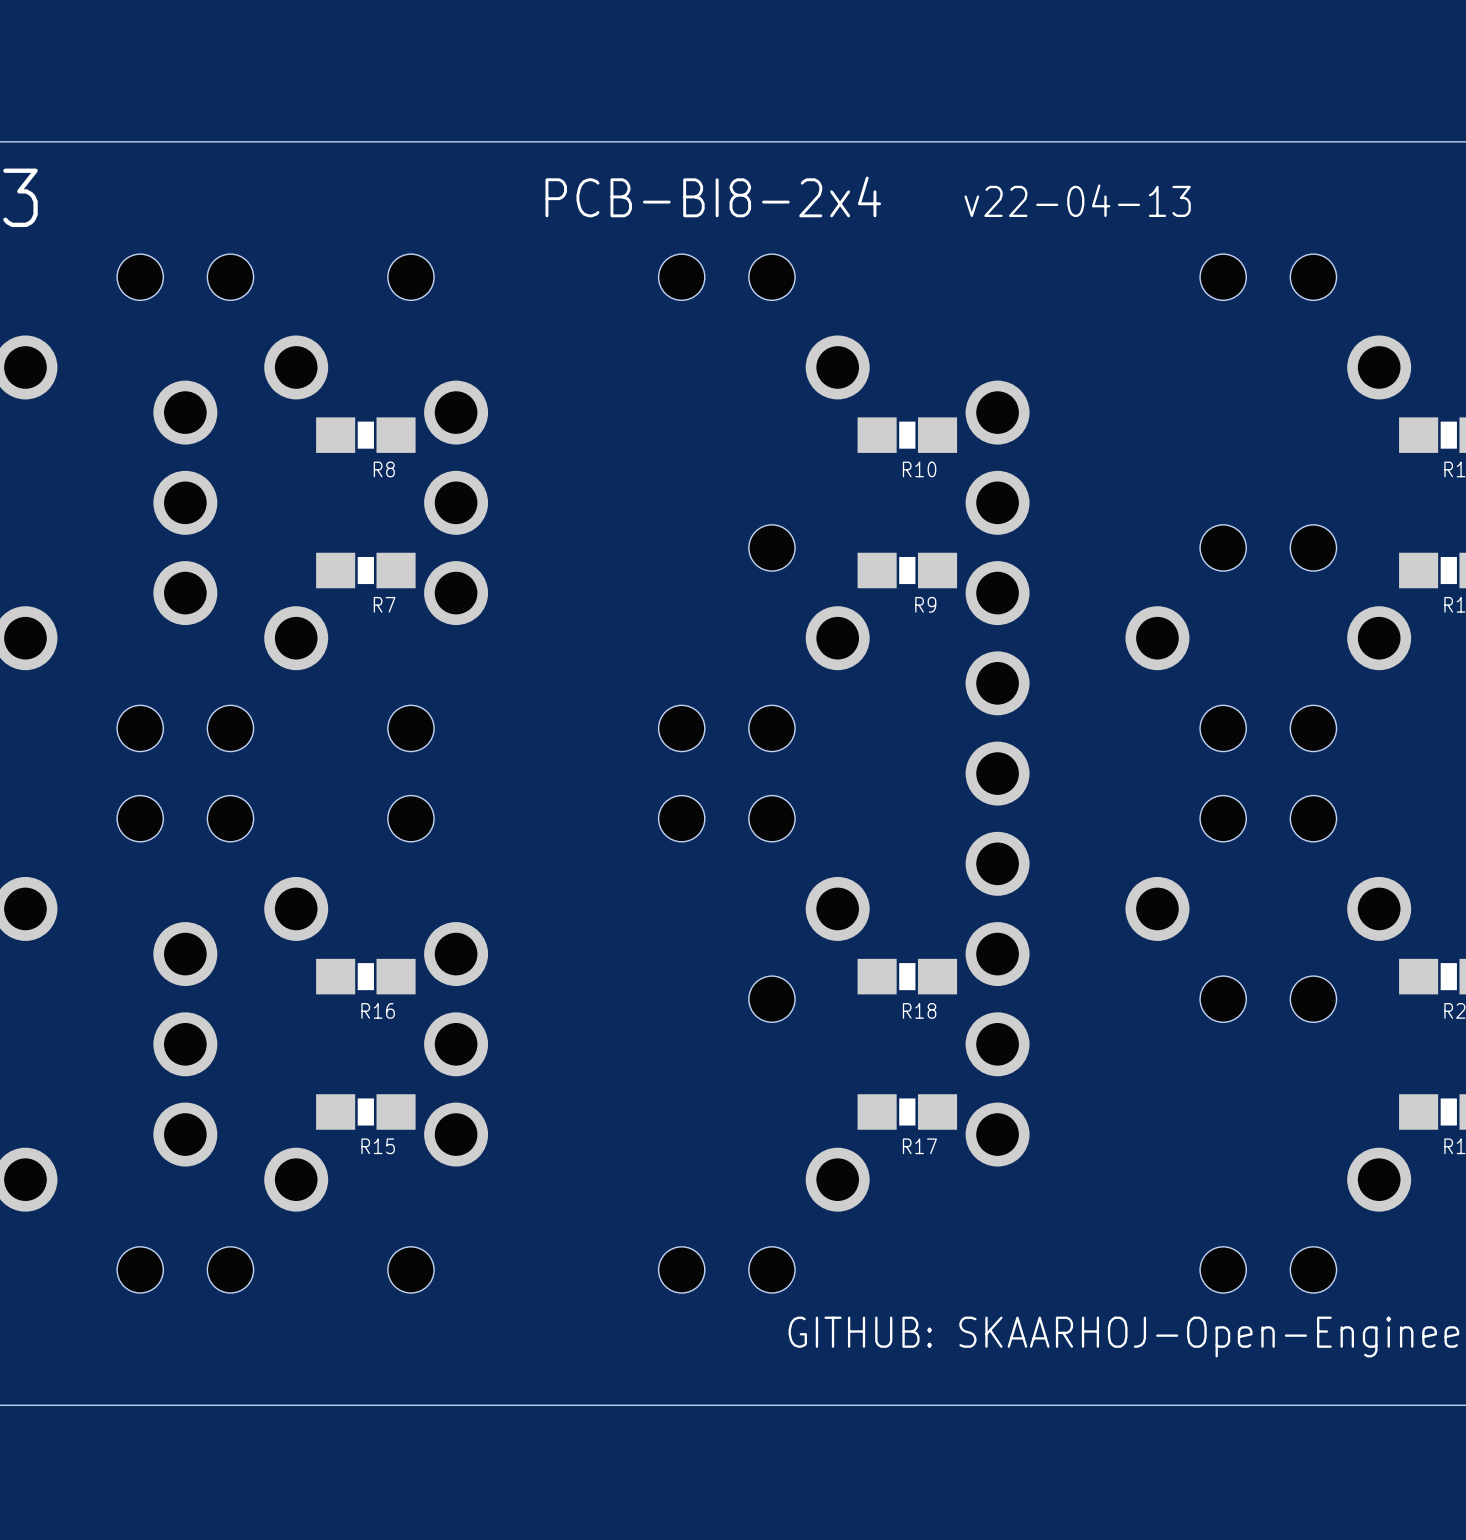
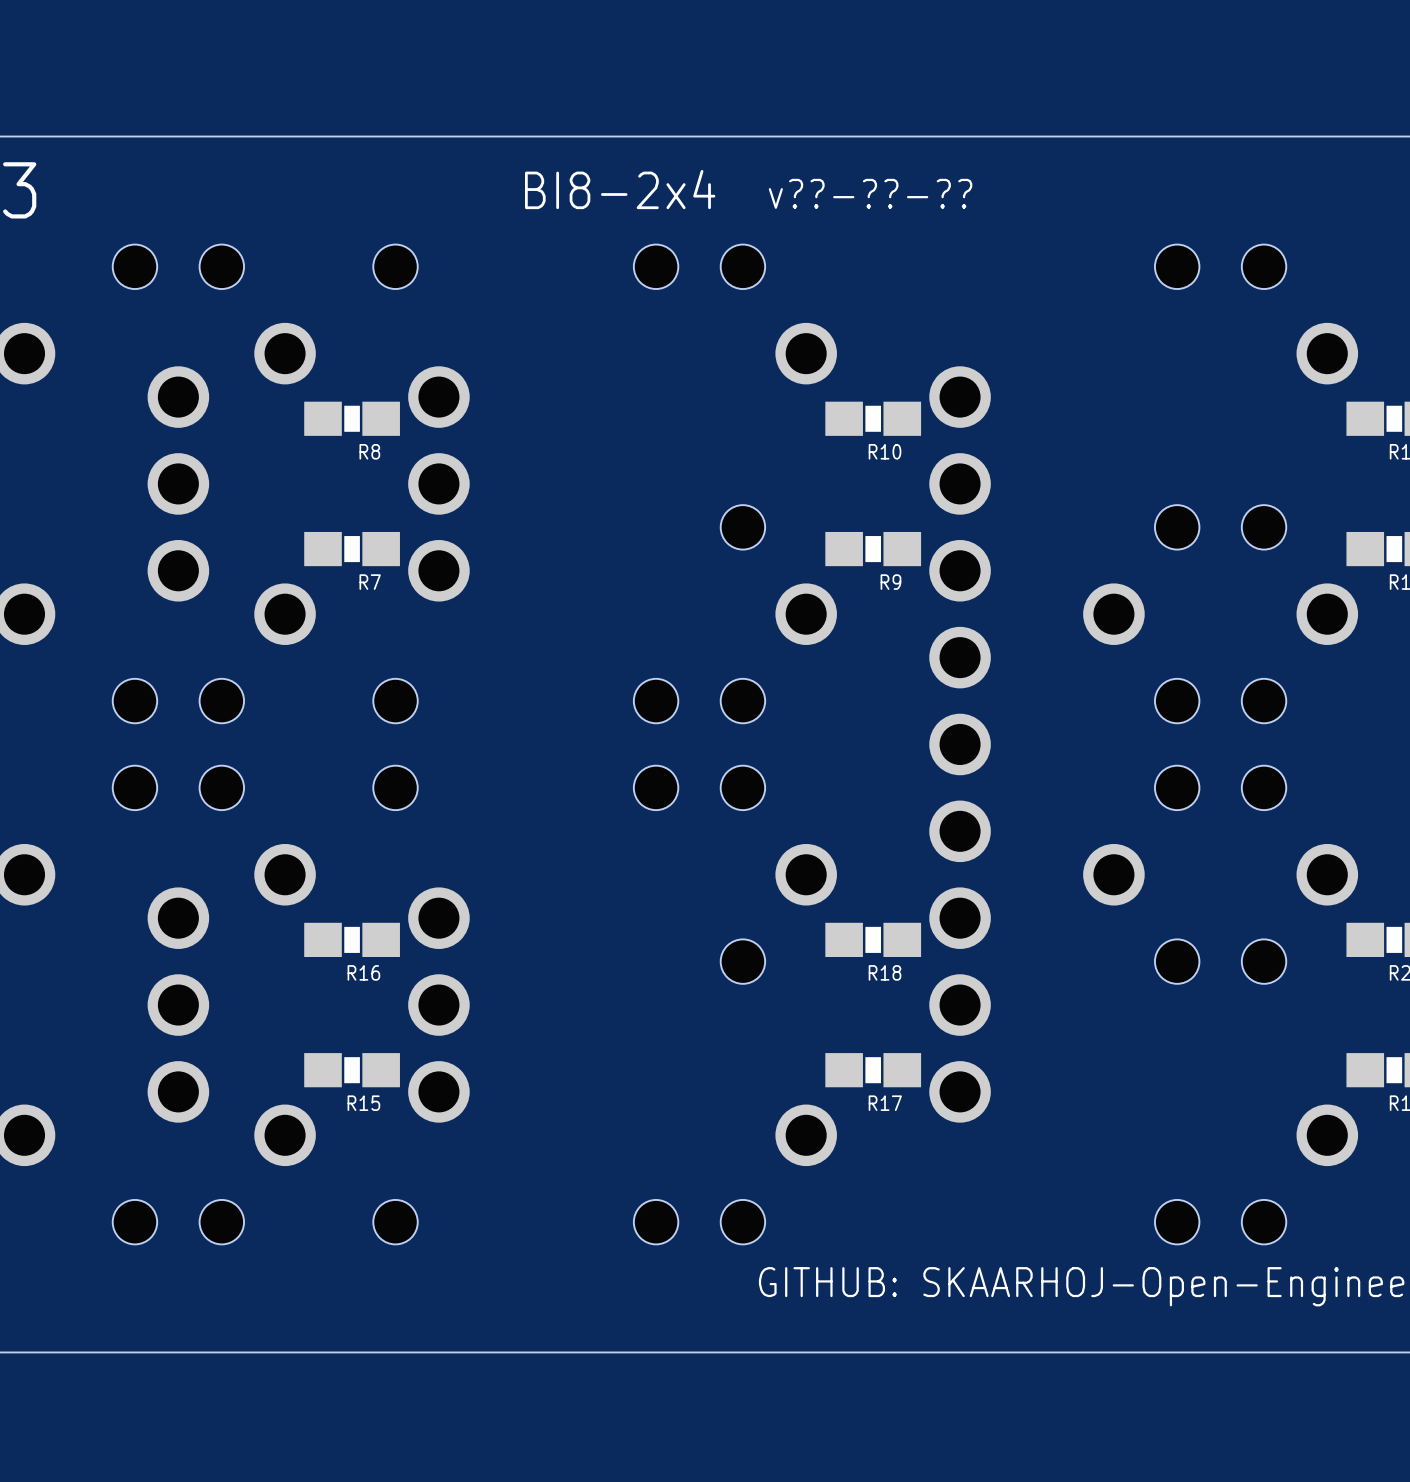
text: PCB-BI8-2x4 (713, 196) -> BI8-2x4 (620, 189)
text: v22-04-13 (1077, 200) -> none
text: none -> v??-??-?? (870, 193)

